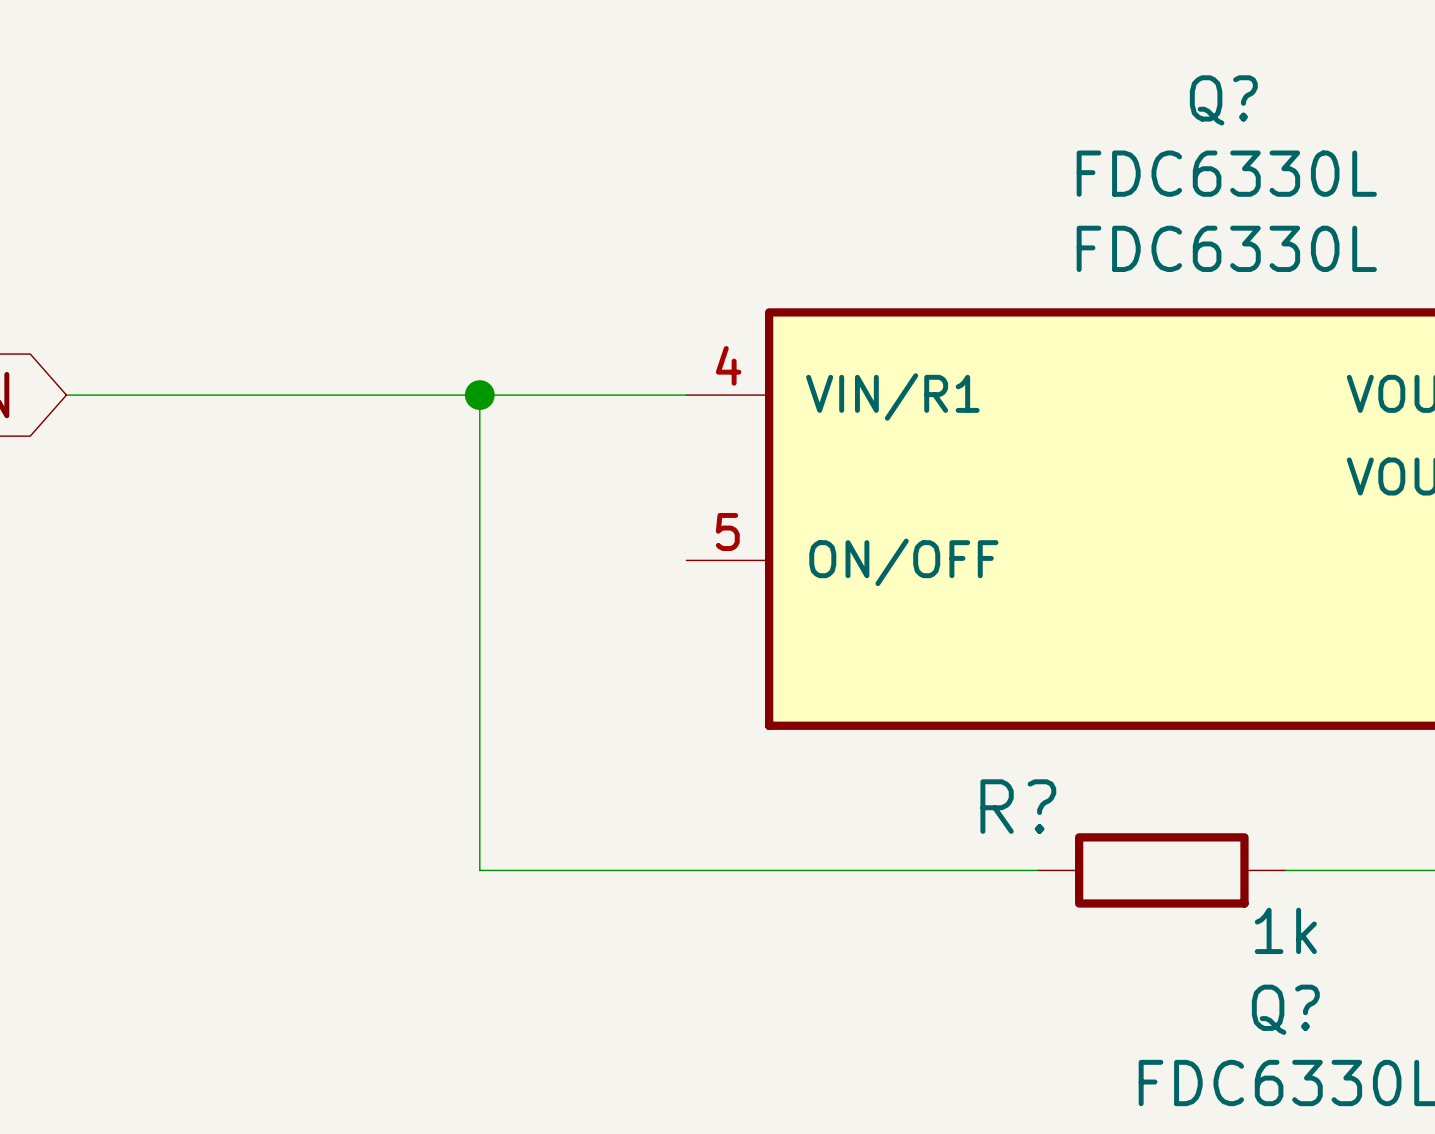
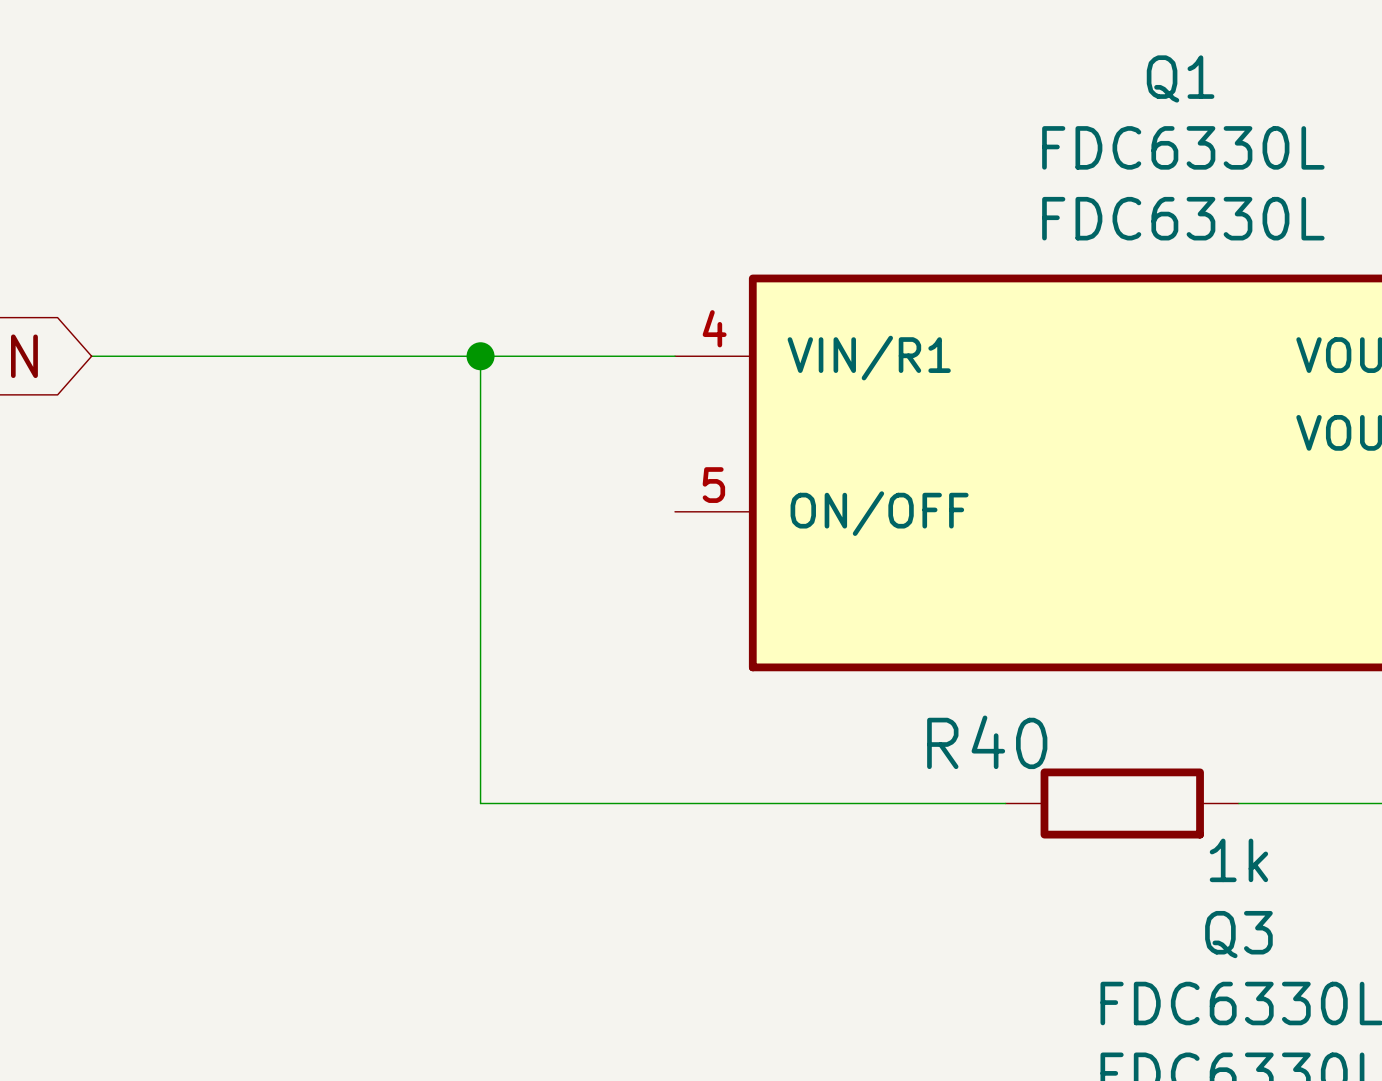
Q? name: Q? (1223, 100) -> Q1 (1180, 78)
R? name: R? (1018, 806) -> R40 (987, 742)
Q? name: Q? (1285, 1009) -> Q3 (1238, 934)

